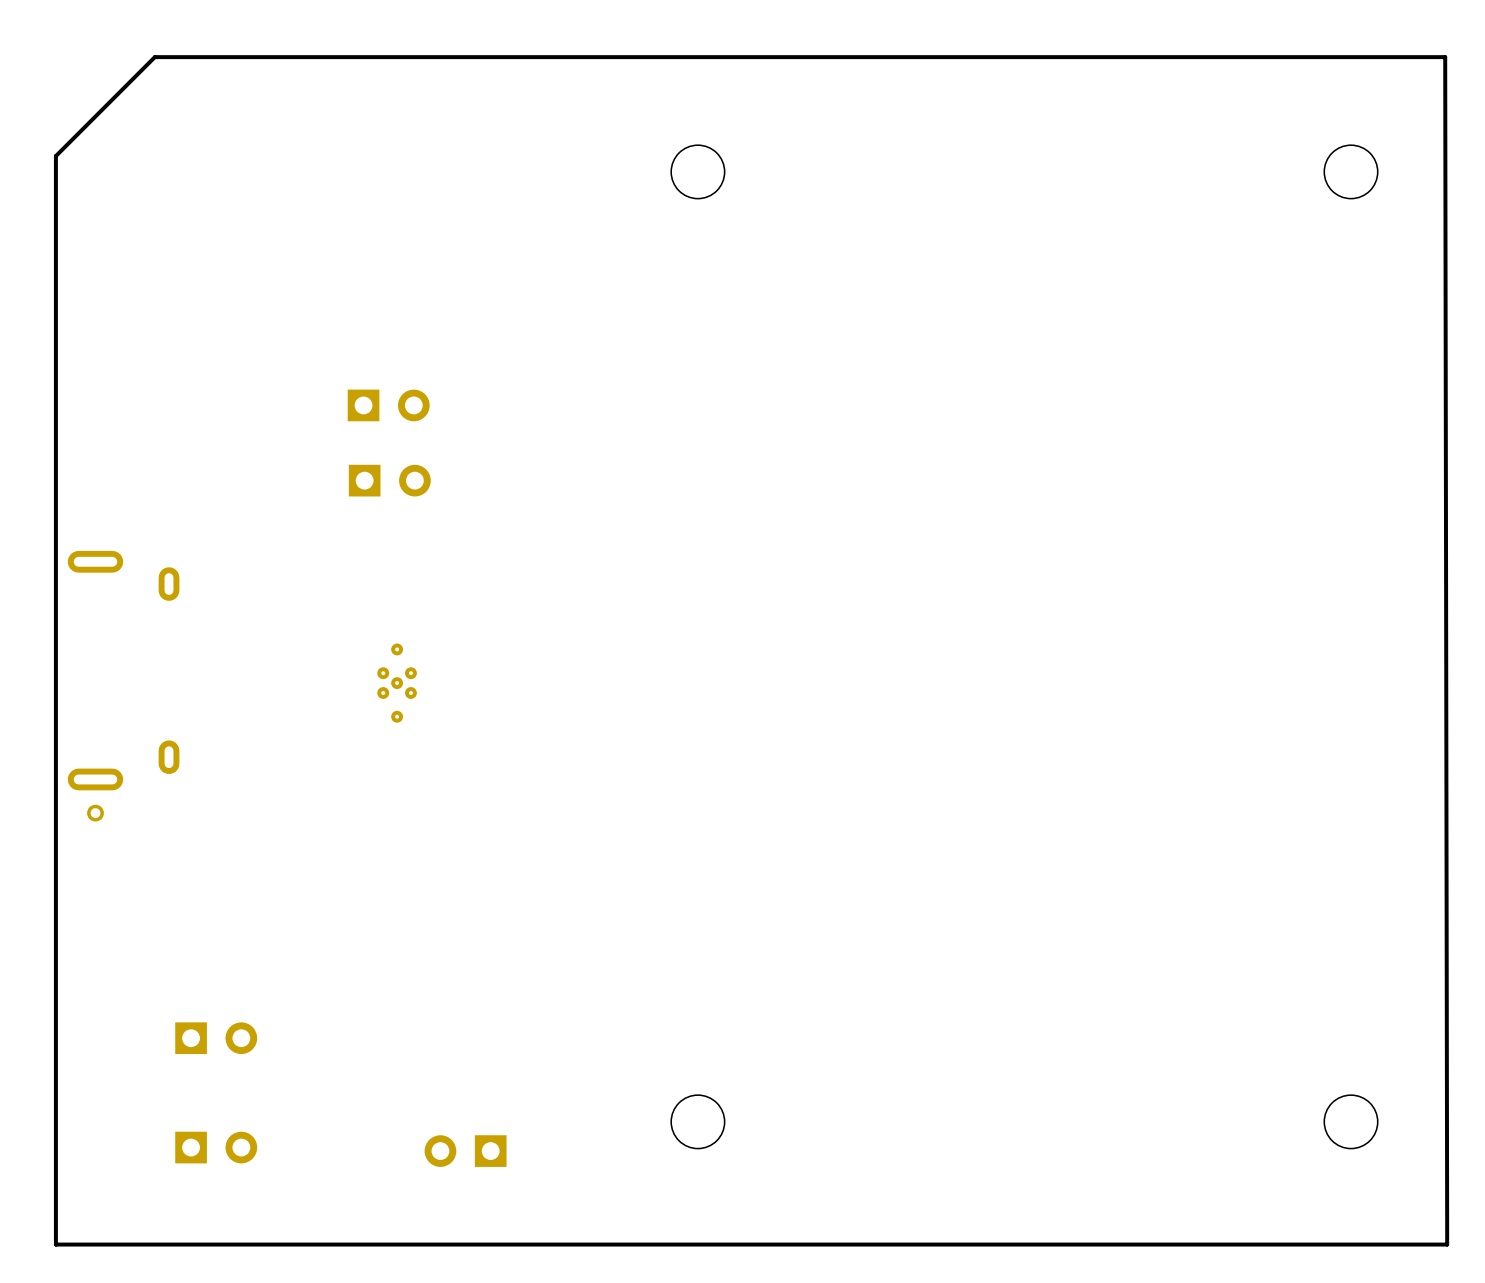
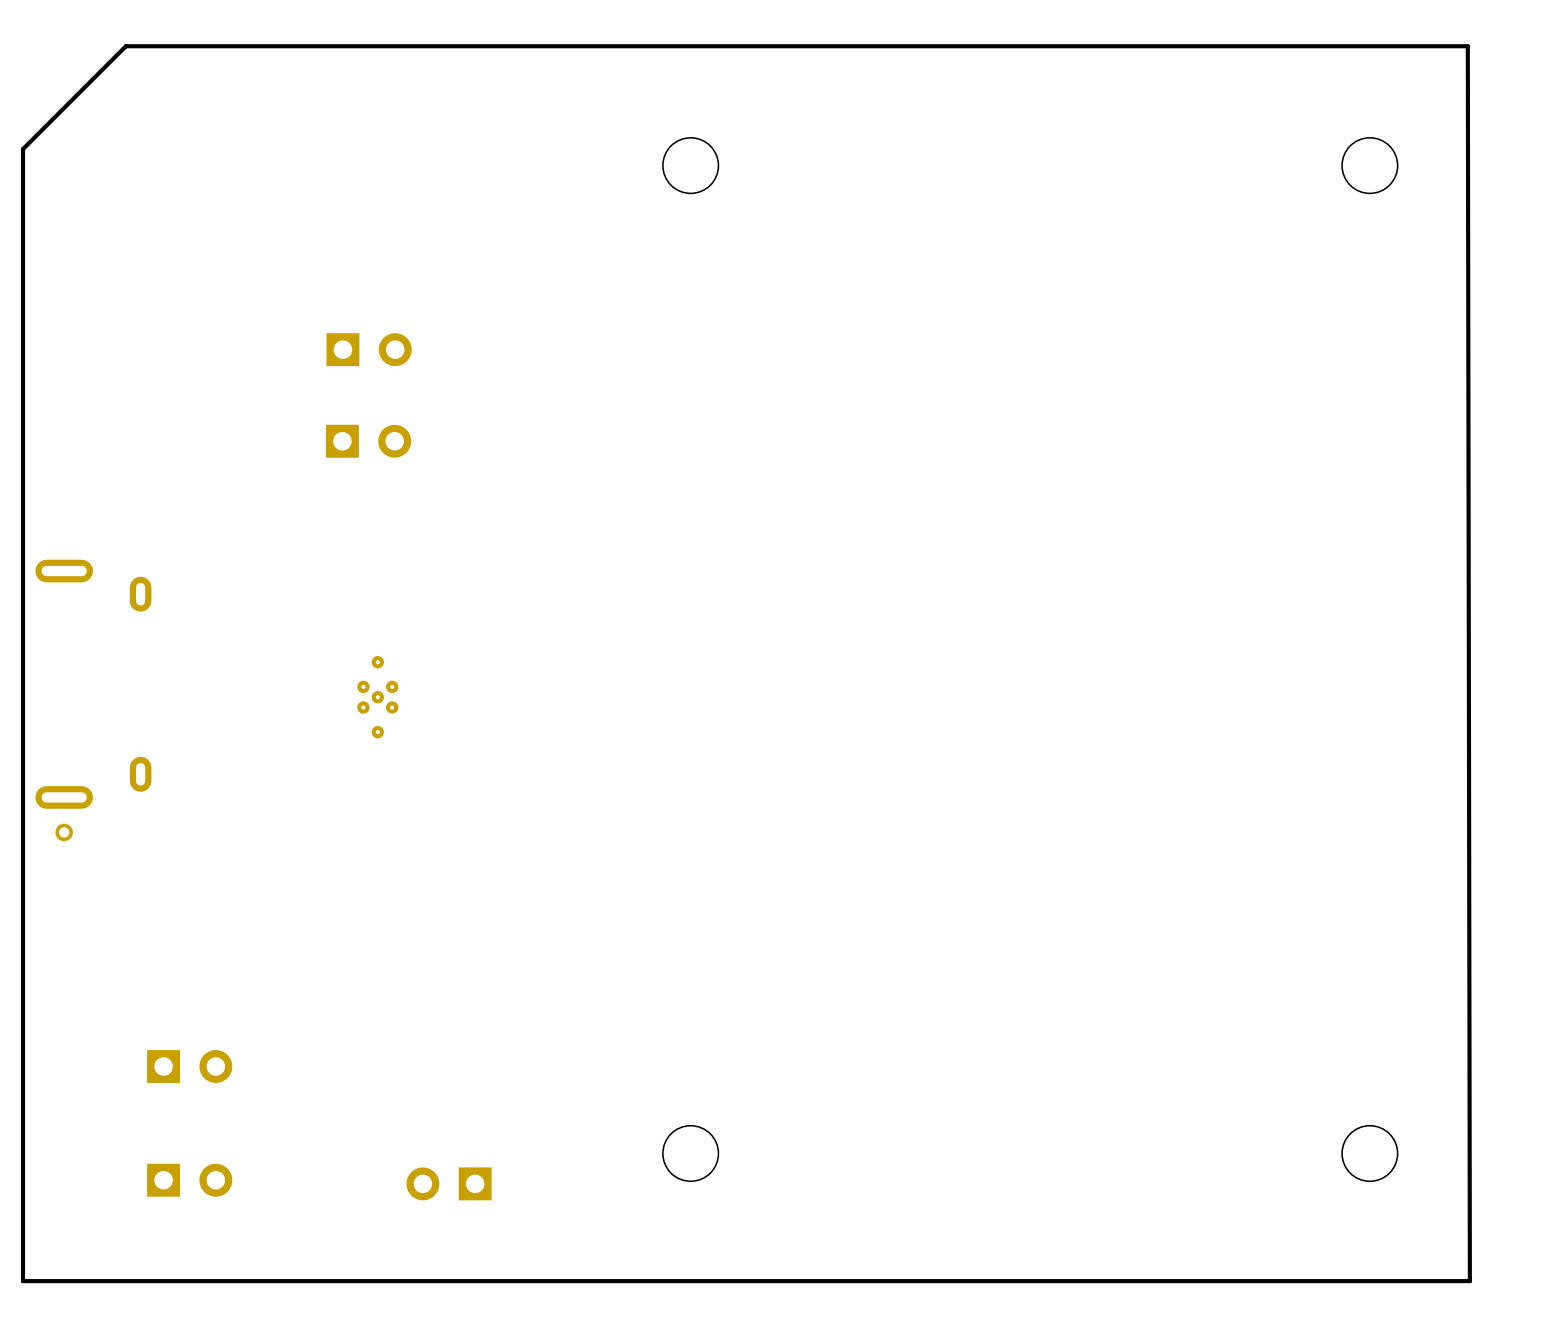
part: none -> (369, 349)
part: (388, 405) -> none
part: none -> (368, 441)
part: (389, 480) -> none

